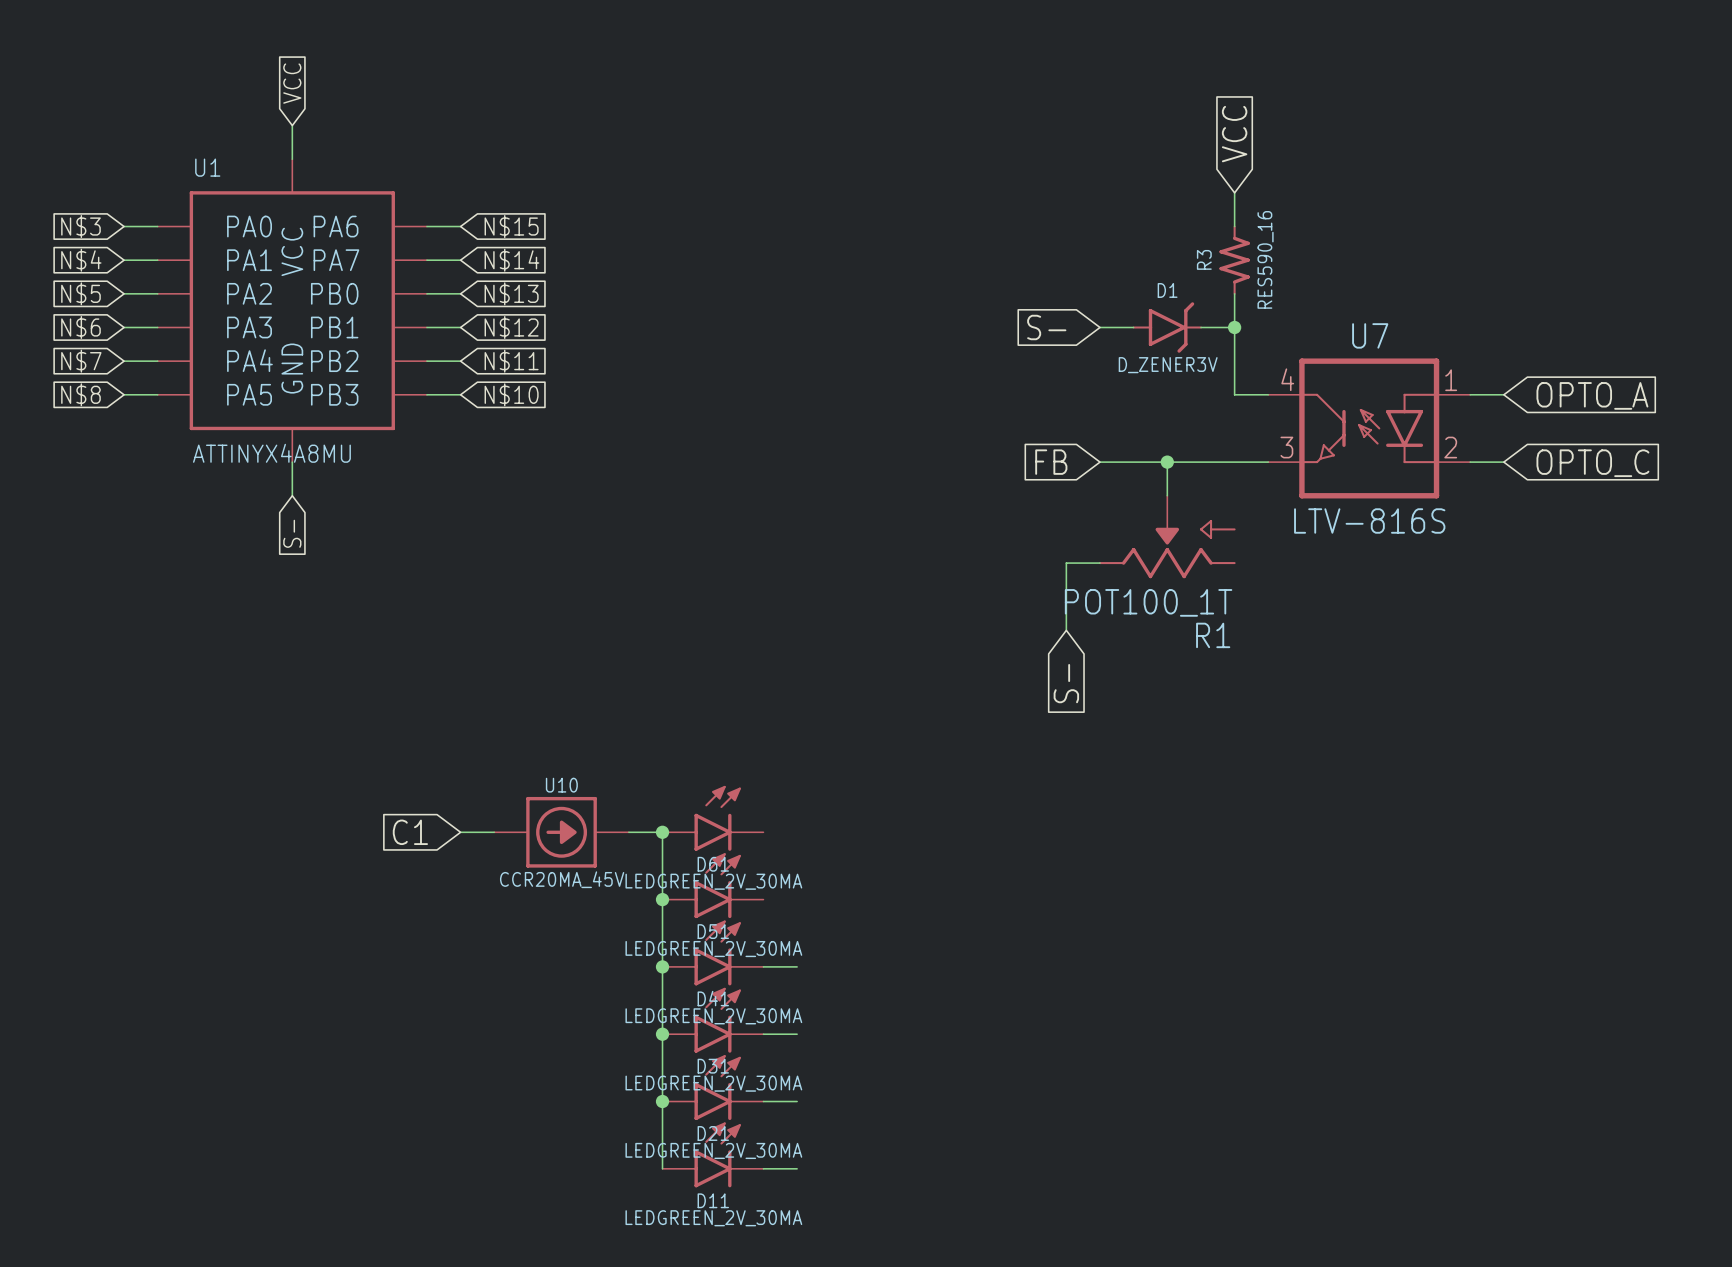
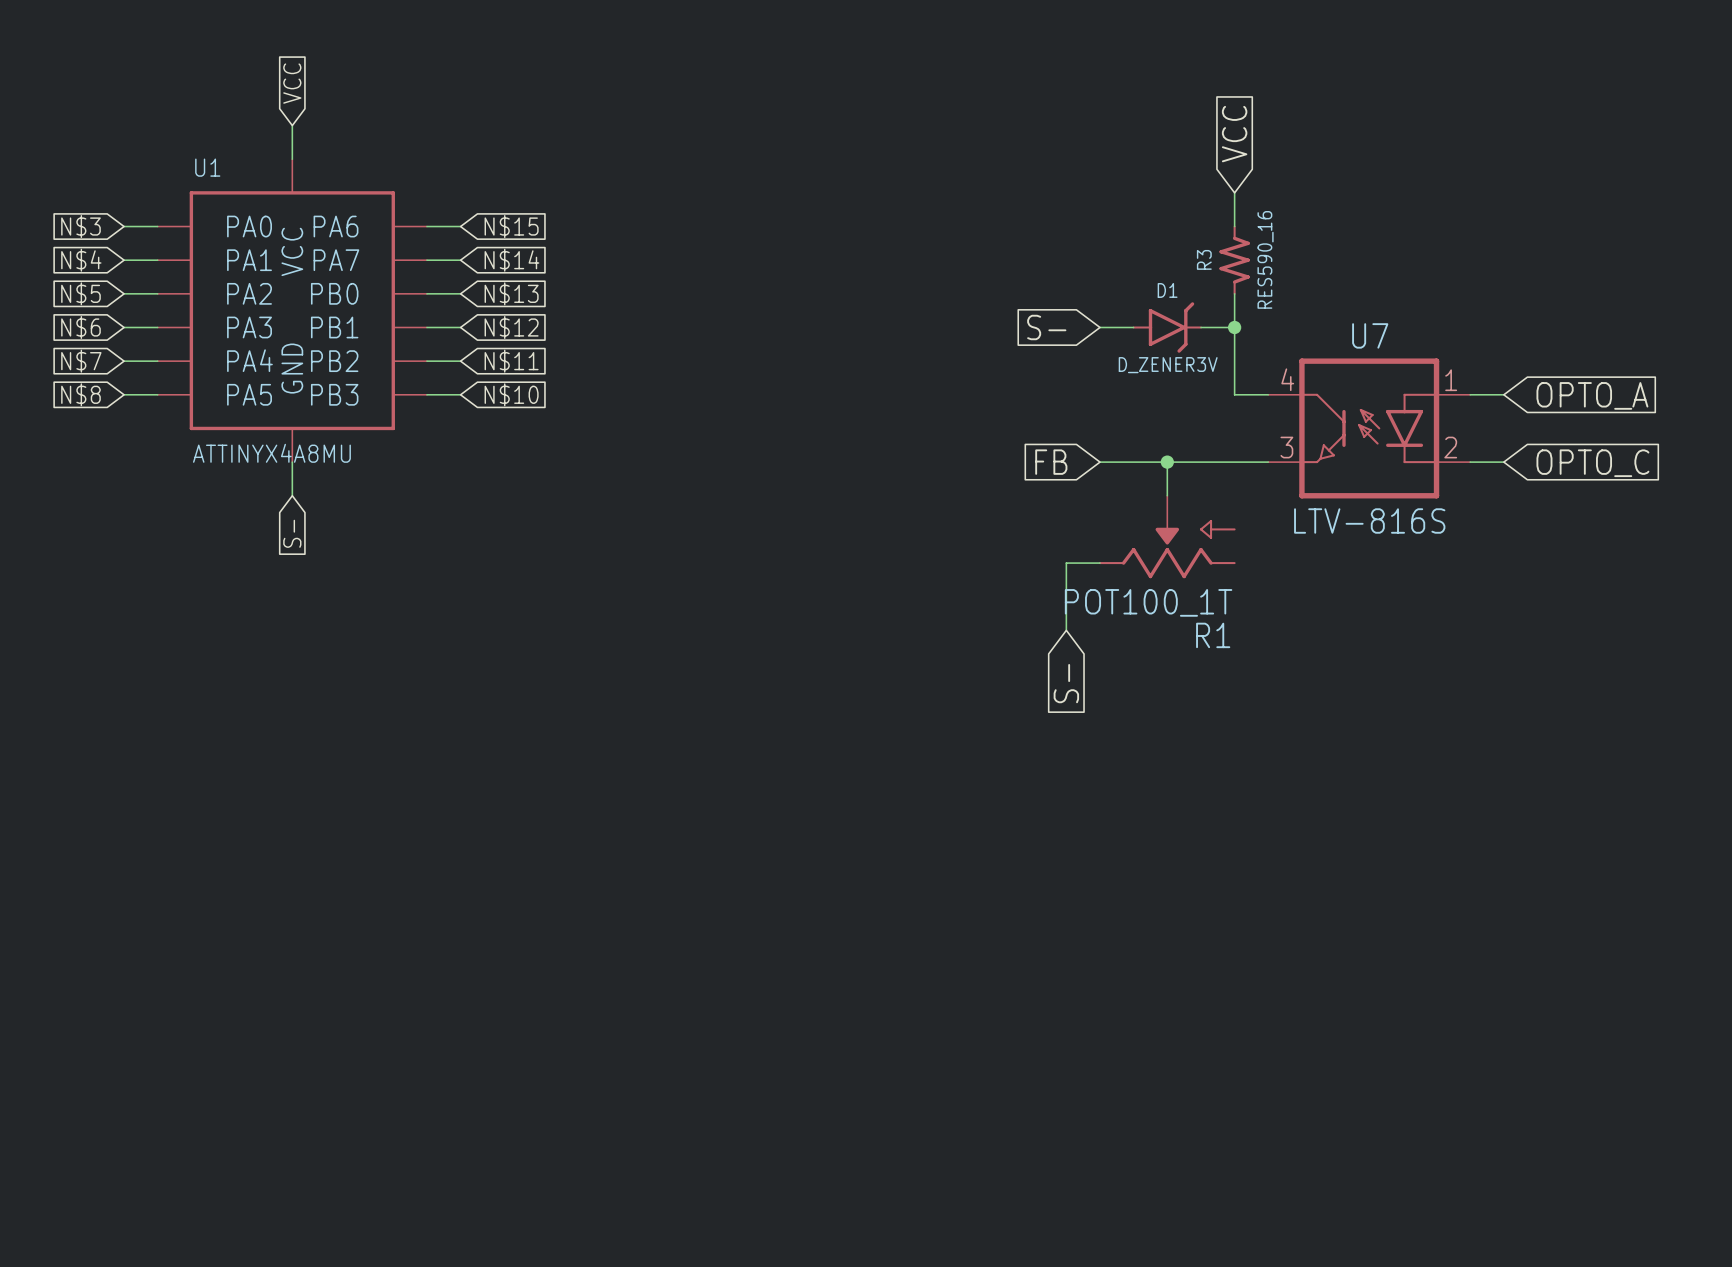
D61: LEDGREEN_2V_30MA (712, 818) -> none
global label: C1 (410, 832) -> none
wire: (460, 832) (494, 832) -> none
U10: CCR20MA_45V (561, 832) -> none
wire: (628, 832) (662, 832) (662, 1168) -> none
junction: (662, 832) -> none
D51: LEDGREEN_2V_30MA (712, 885) -> none
junction: (662, 899) -> none
D41: LEDGREEN_2V_30MA (712, 952) -> none
junction: (662, 966) -> none
wire: (763, 966) (797, 966) -> none
D31: LEDGREEN_2V_30MA (712, 1020) -> none
junction: (662, 1034) -> none
wire: (763, 1034) (797, 1034) -> none
D21: LEDGREEN_2V_30MA (712, 1087) -> none
junction: (662, 1101) -> none
wire: (763, 1101) (797, 1101) -> none
D11: LEDGREEN_2V_30MA (712, 1154) -> none
wire: (763, 1168) (797, 1168) -> none

